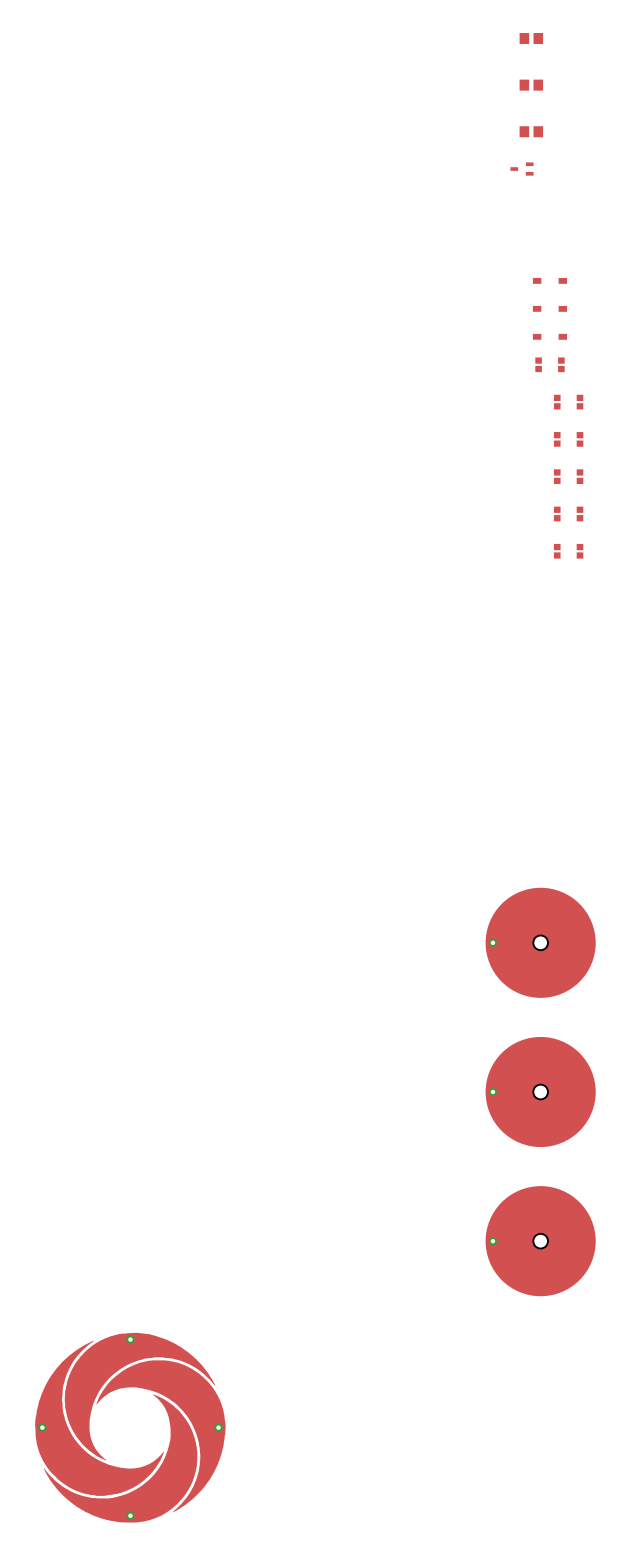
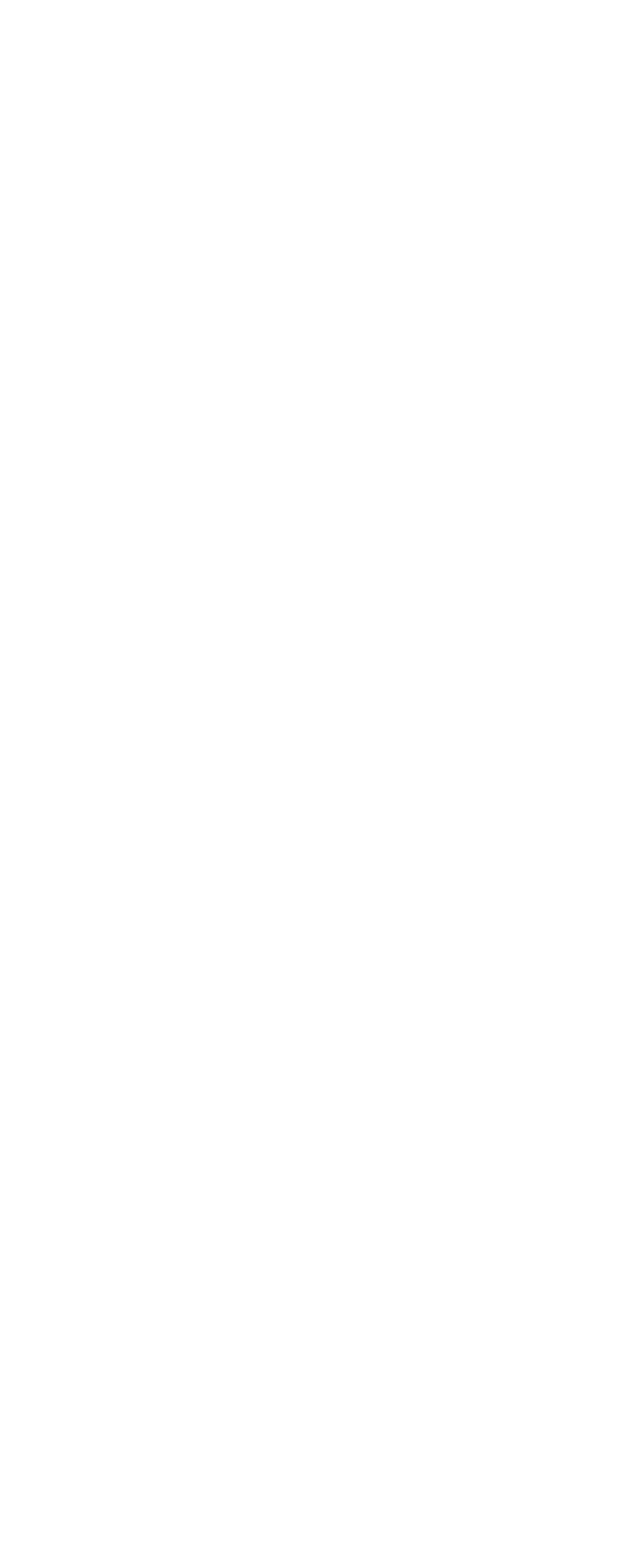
part: (531, 38) -> none
part: (531, 85) -> none
part: (531, 131) -> none
part: (522, 169) -> none
part: (549, 280) -> none
part: (549, 308) -> none
part: (549, 336) -> none
part: (549, 364) -> none
part: (568, 402) -> none
part: (568, 439) -> none
part: (568, 476) -> none
part: (568, 513) -> none
part: (568, 551) -> none
part: (540, 942) -> none
part: (540, 1092) -> none
part: (540, 1241) -> none
part: (130, 1427) -> none

